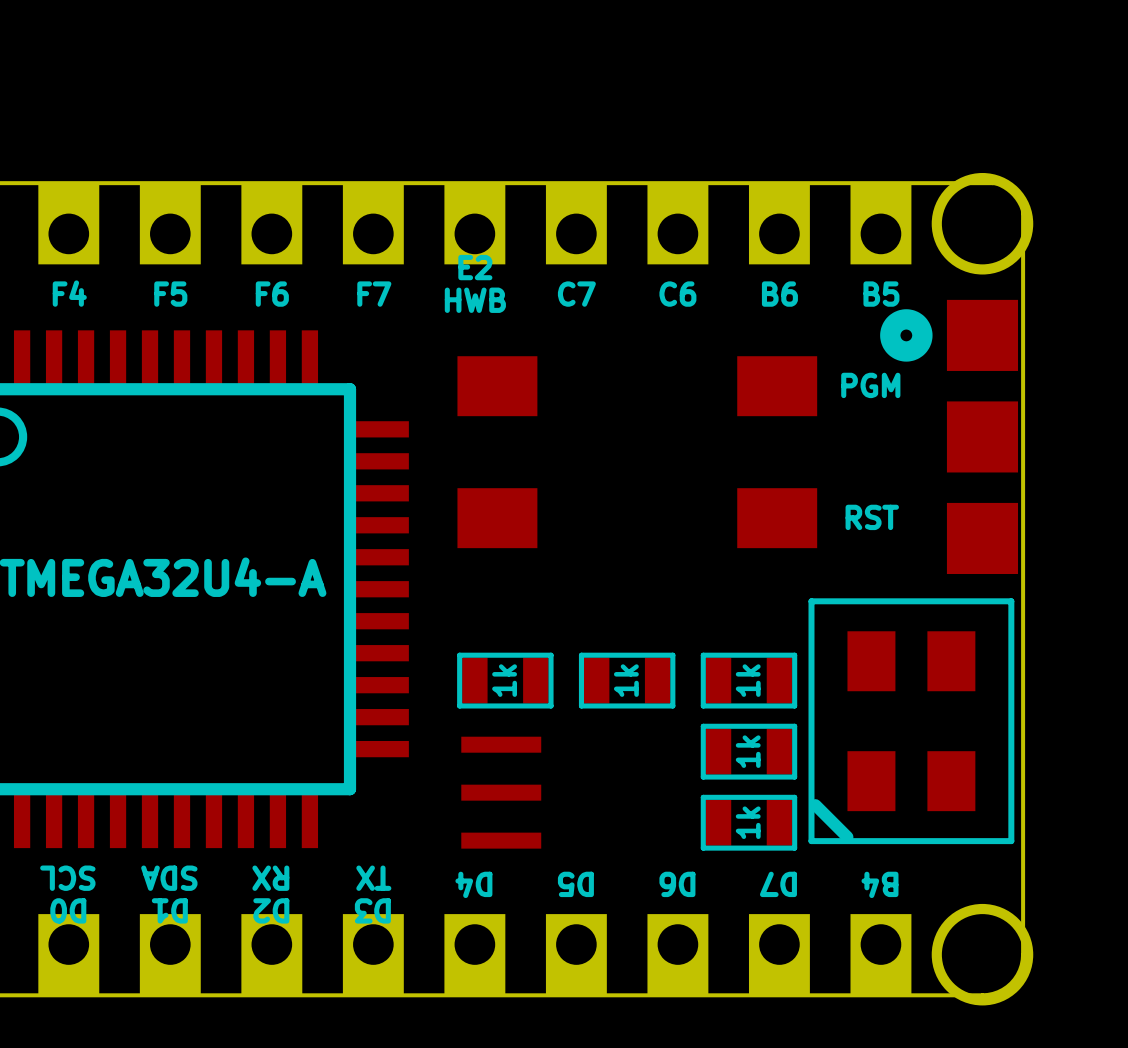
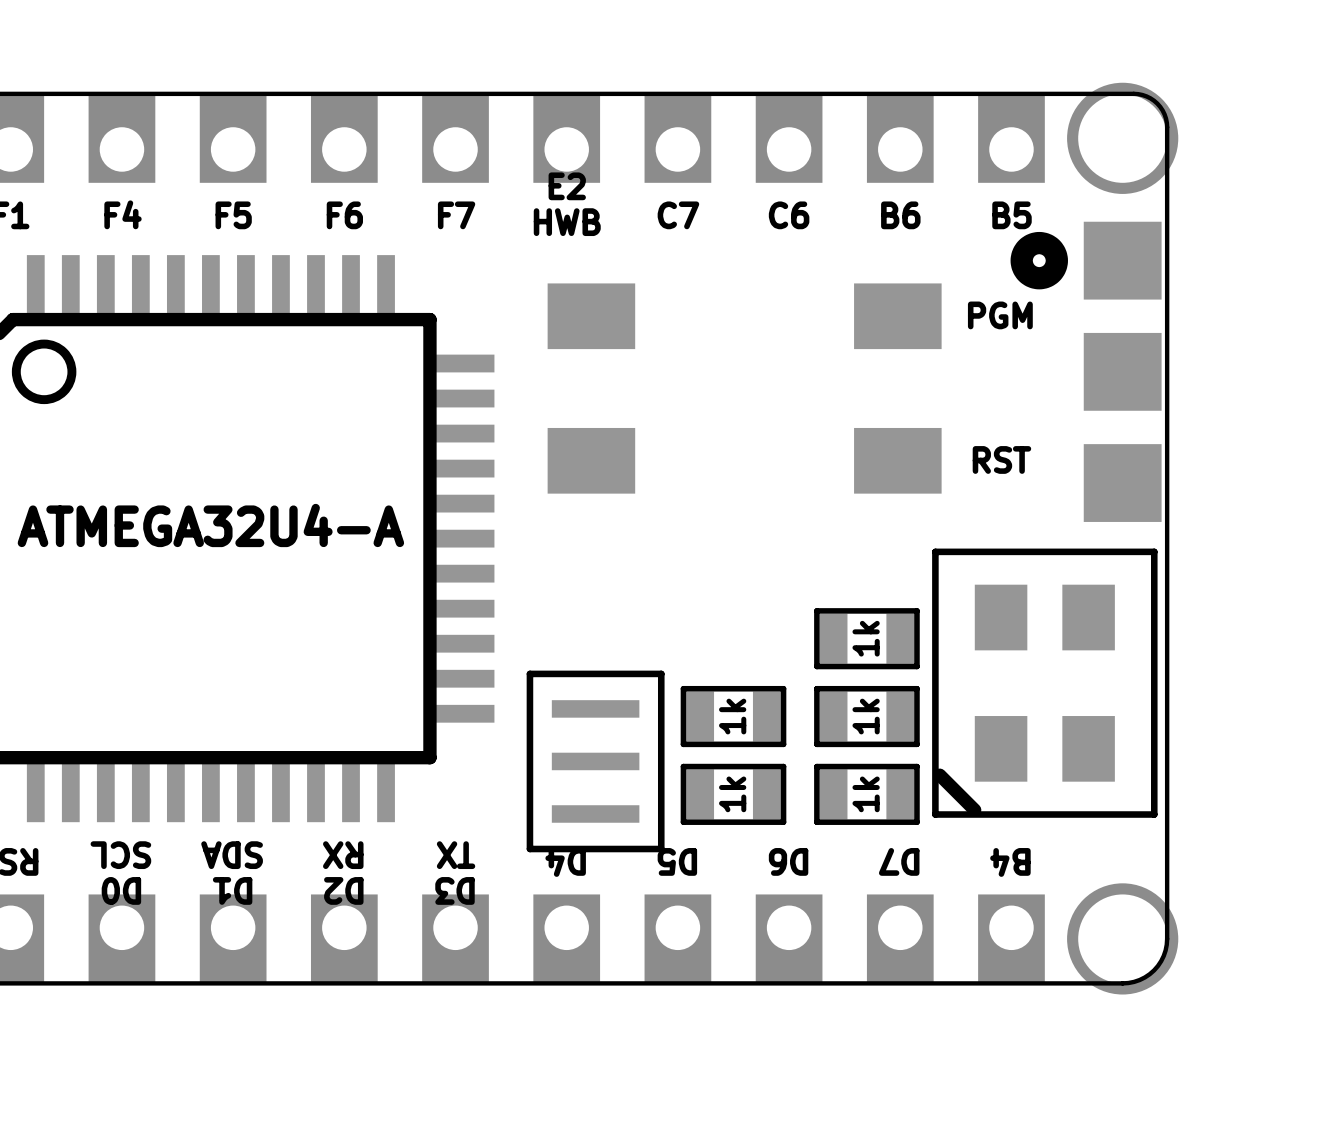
part: 1k (505, 680) -> none
part: 1k (627, 680) -> none
part footprint: [461, 736, 542, 849] -> [526, 670, 665, 853]
part: none -> 1k (733, 716)
part: none -> 1k (733, 794)

